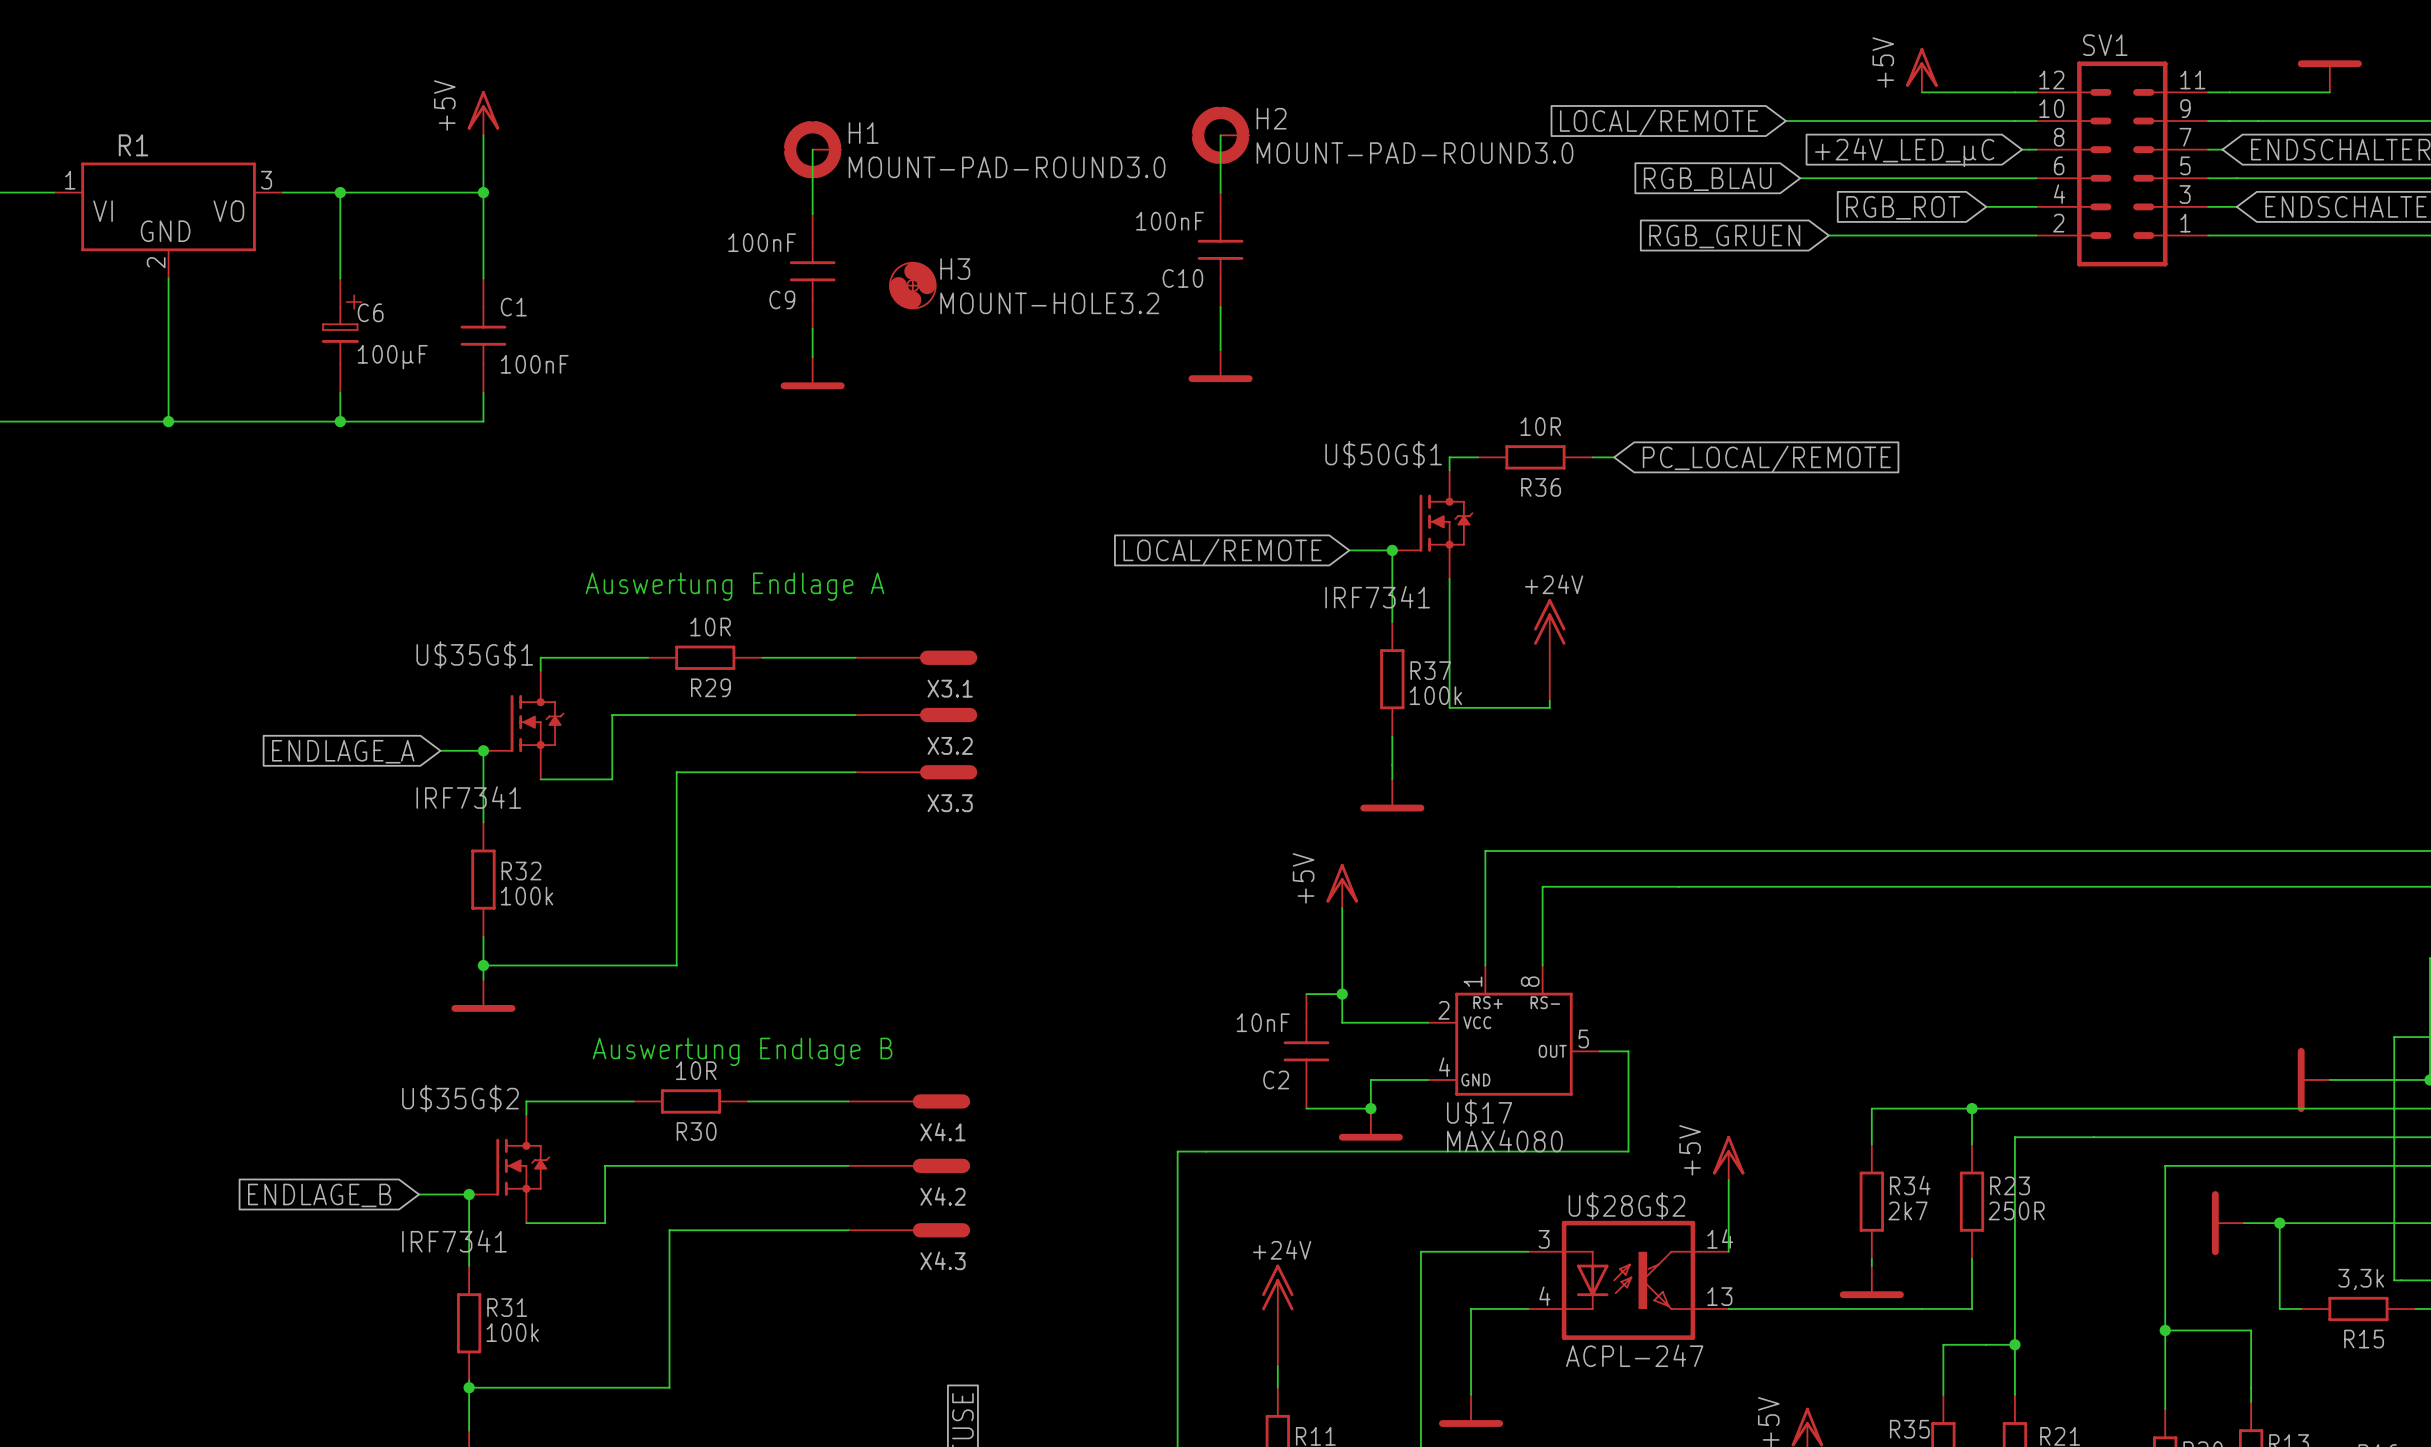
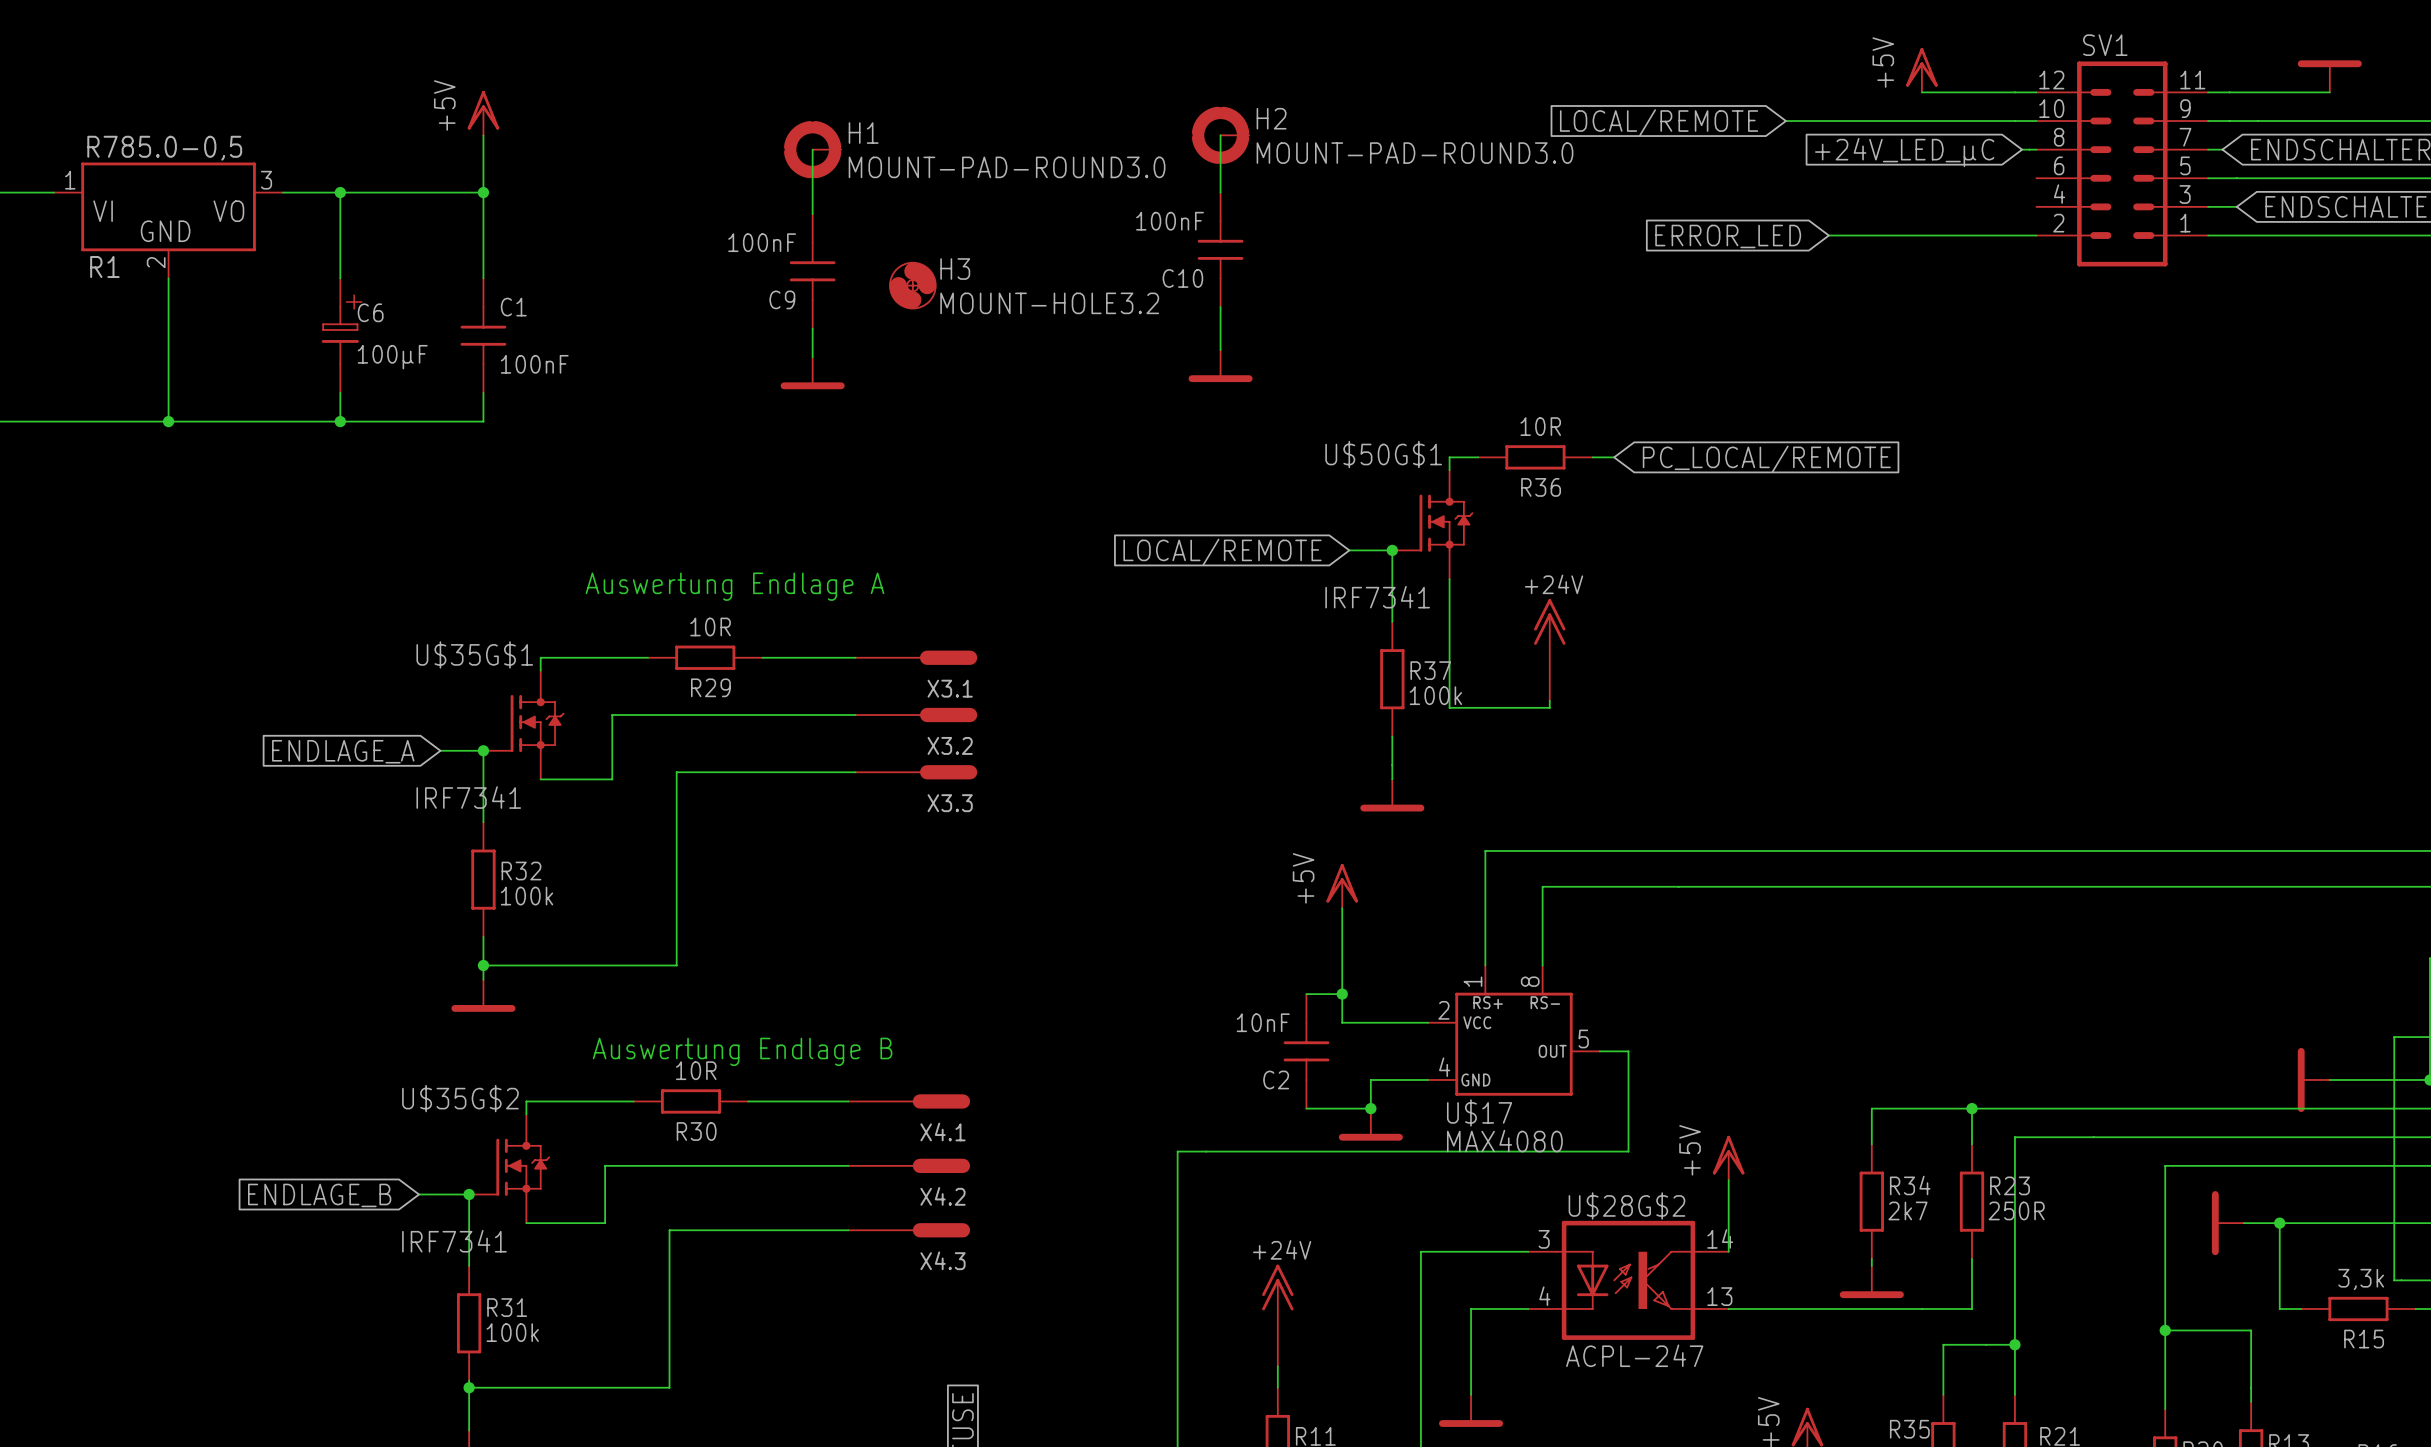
R1 name position: R1 (133, 145) -> R1 (104, 267)
R1 value: none -> R785.0-0,5 (164, 148)
wire: (1800, 178) (2036, 178) -> none
global label: RGB_BLAU (1707, 179) -> none
wire: (1986, 206) (2036, 206) -> none
global label: RGB_ROT (1903, 207) -> none
global label: RGB_GRUEN (1724, 236) -> ERROR_LED (1728, 236)

